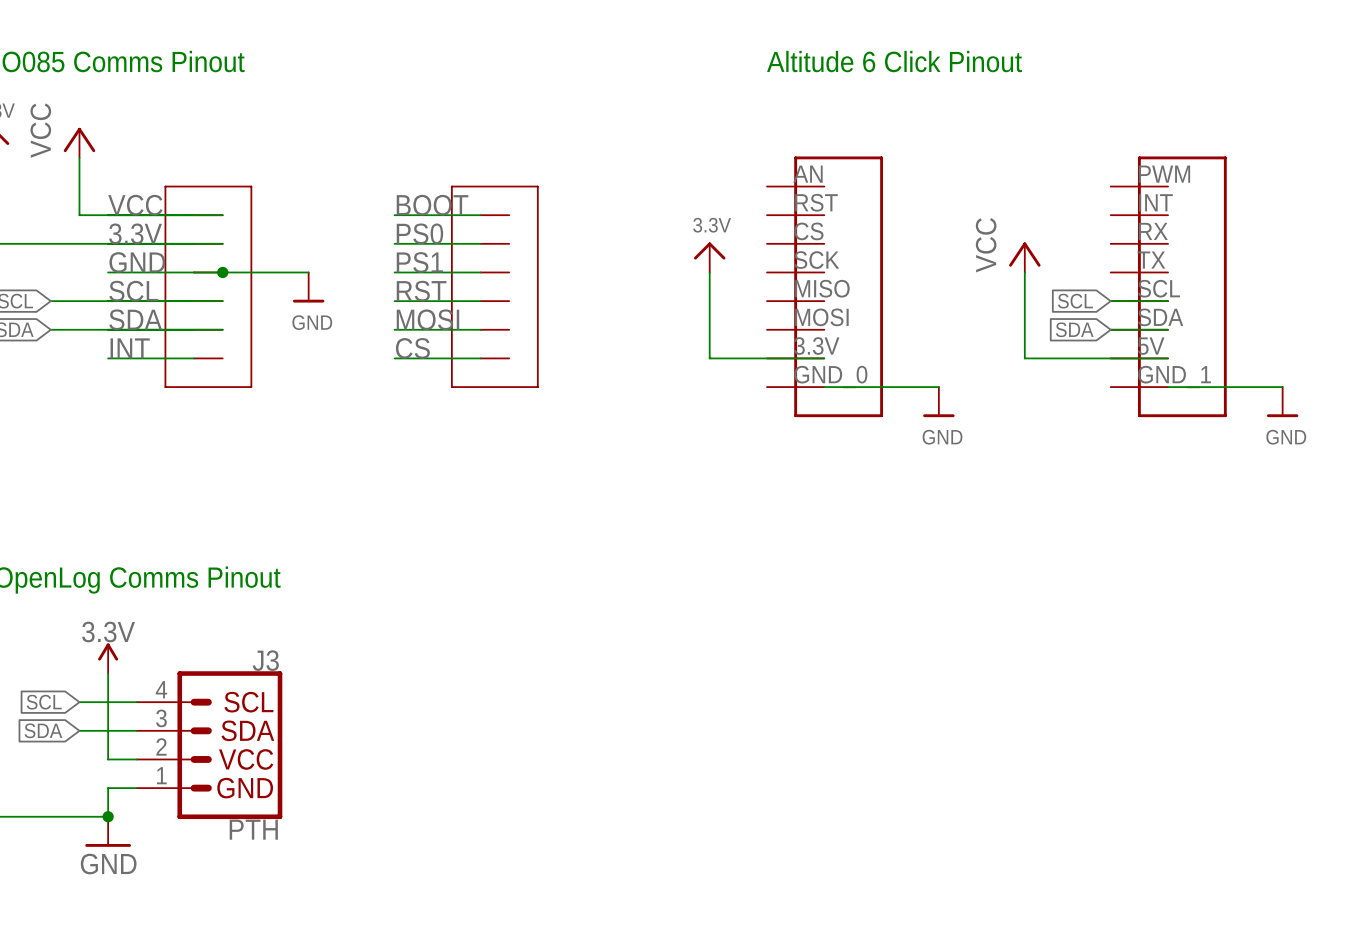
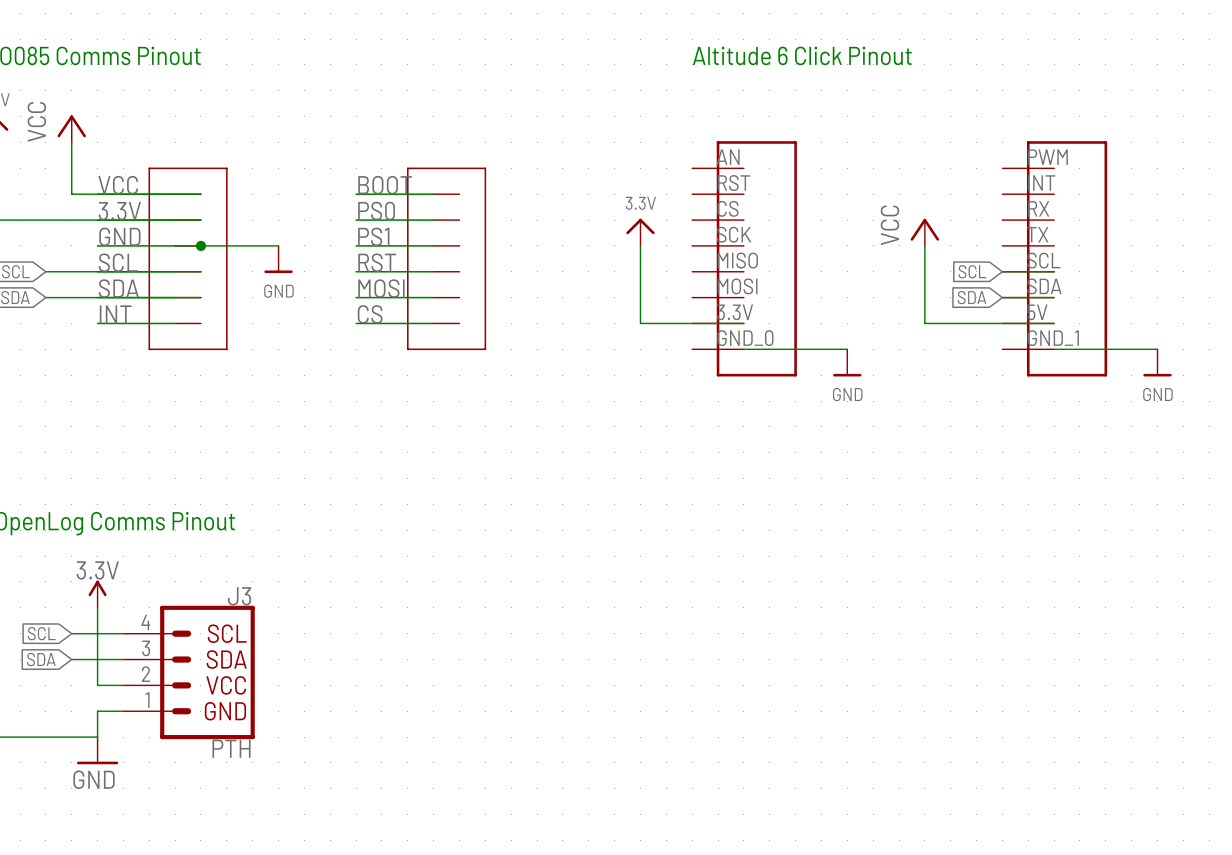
junction: (108, 816) -> none

